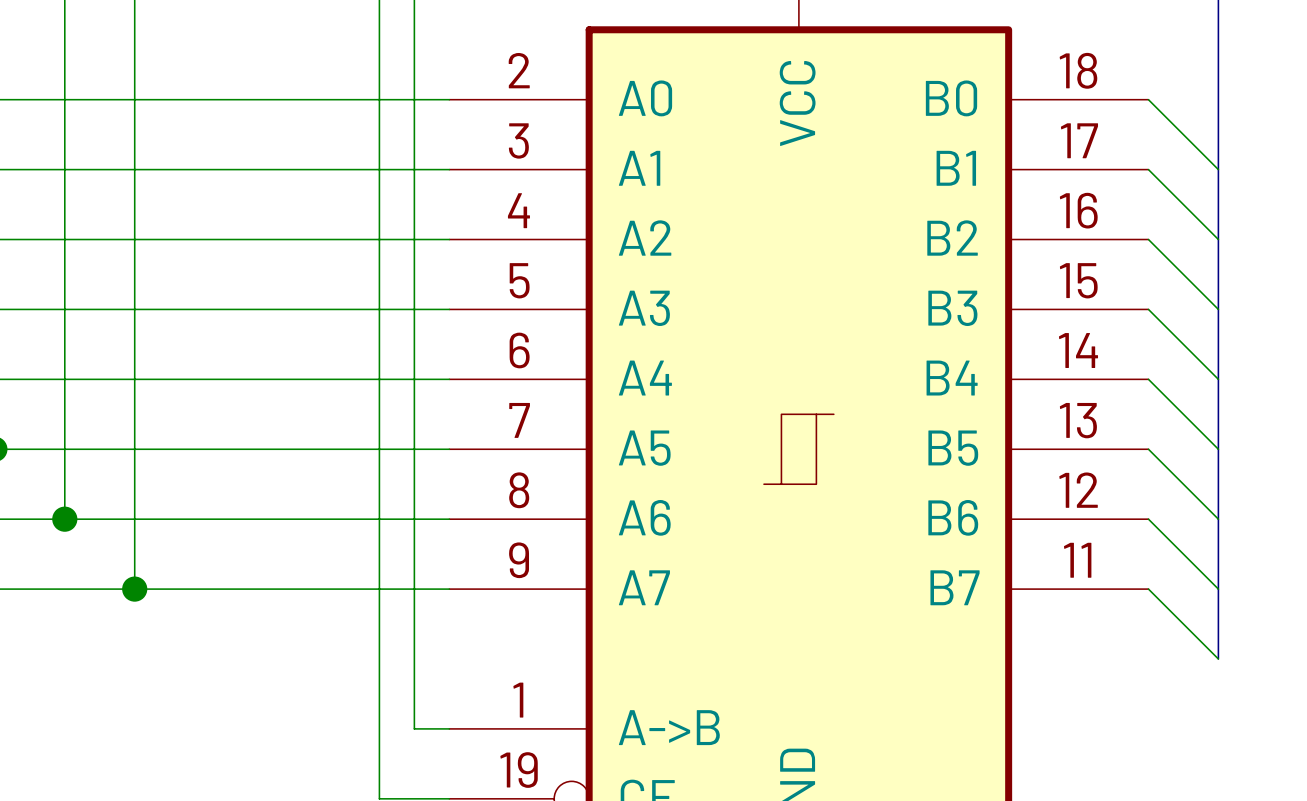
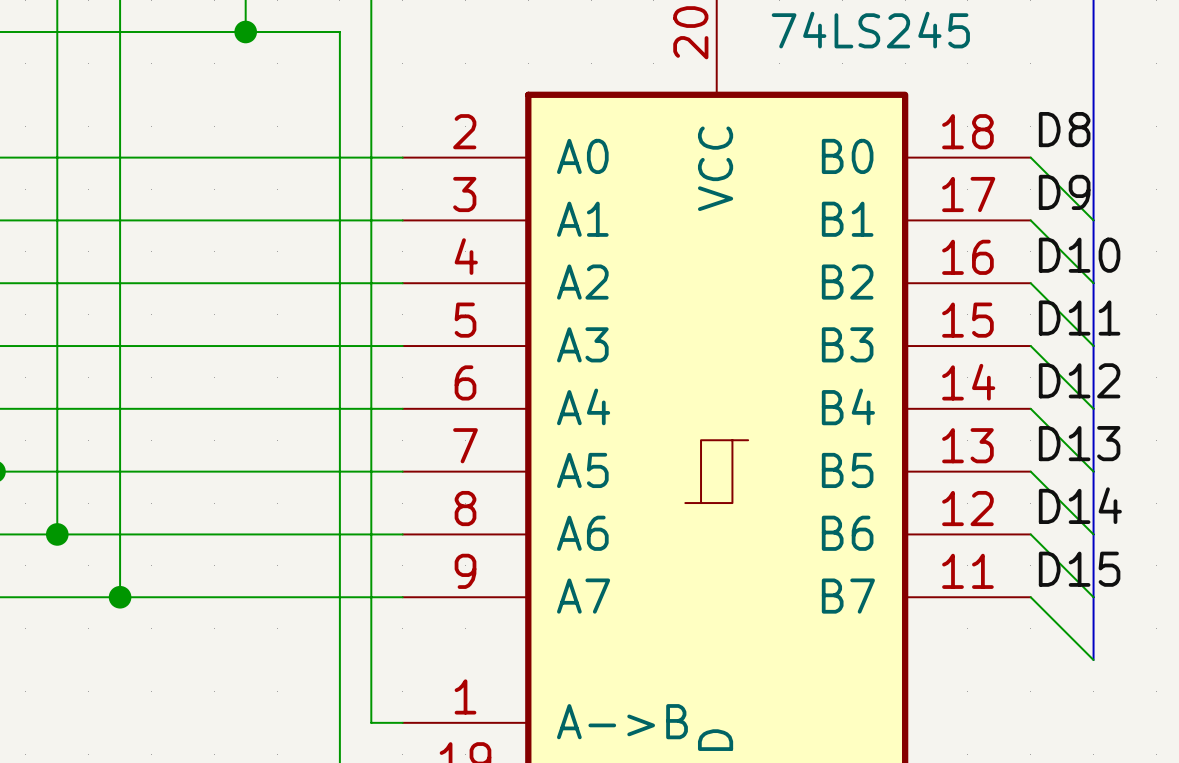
label: none -> D8 (1064, 129)
label: none -> D9 (1064, 192)
label: none -> D10 (1079, 255)
label: none -> D11 (1079, 318)
label: none -> D12 (1079, 380)
label: none -> D13 (1079, 443)
label: none -> D14 (1080, 505)
label: none -> D15 (1079, 569)

